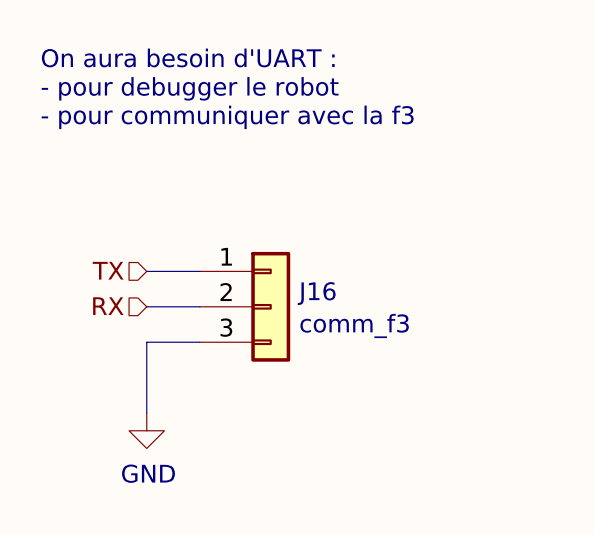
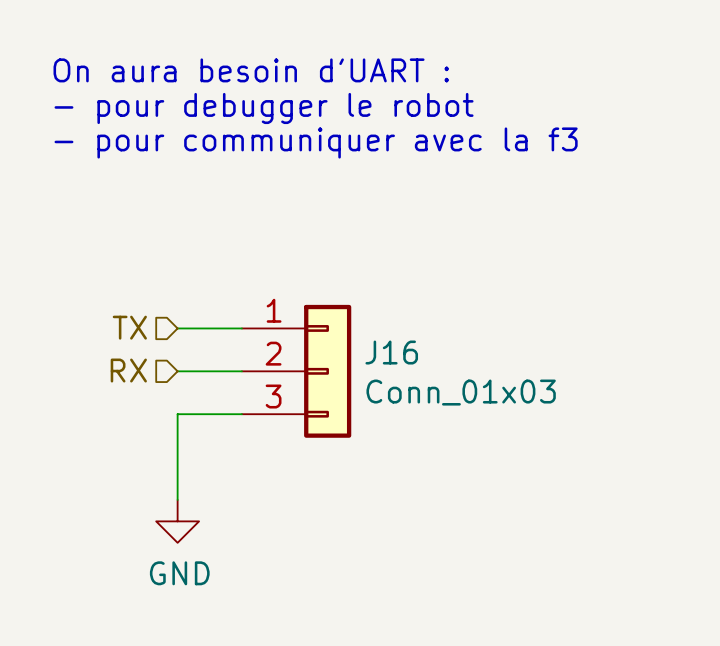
J16 value: comm_f3 (354, 325) -> Conn_01x03 (461, 392)

